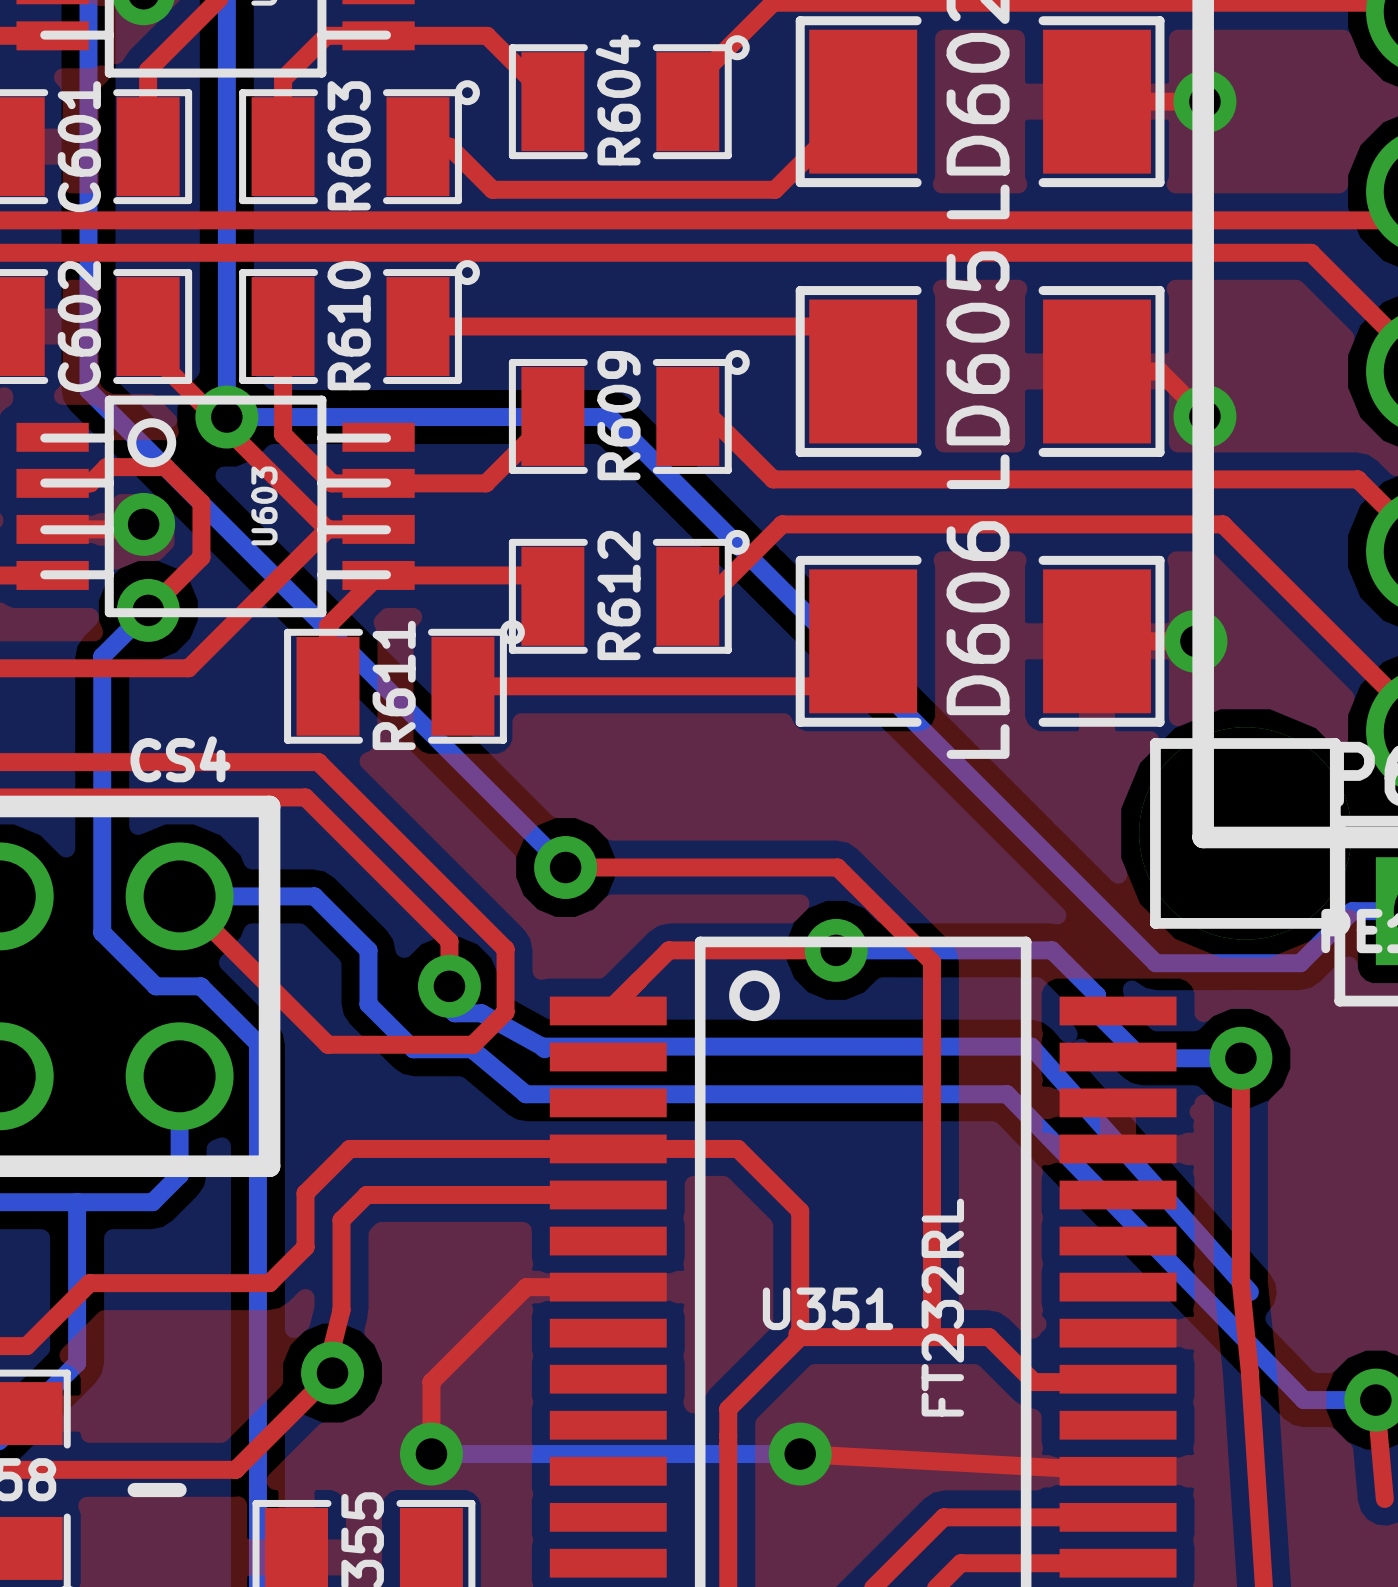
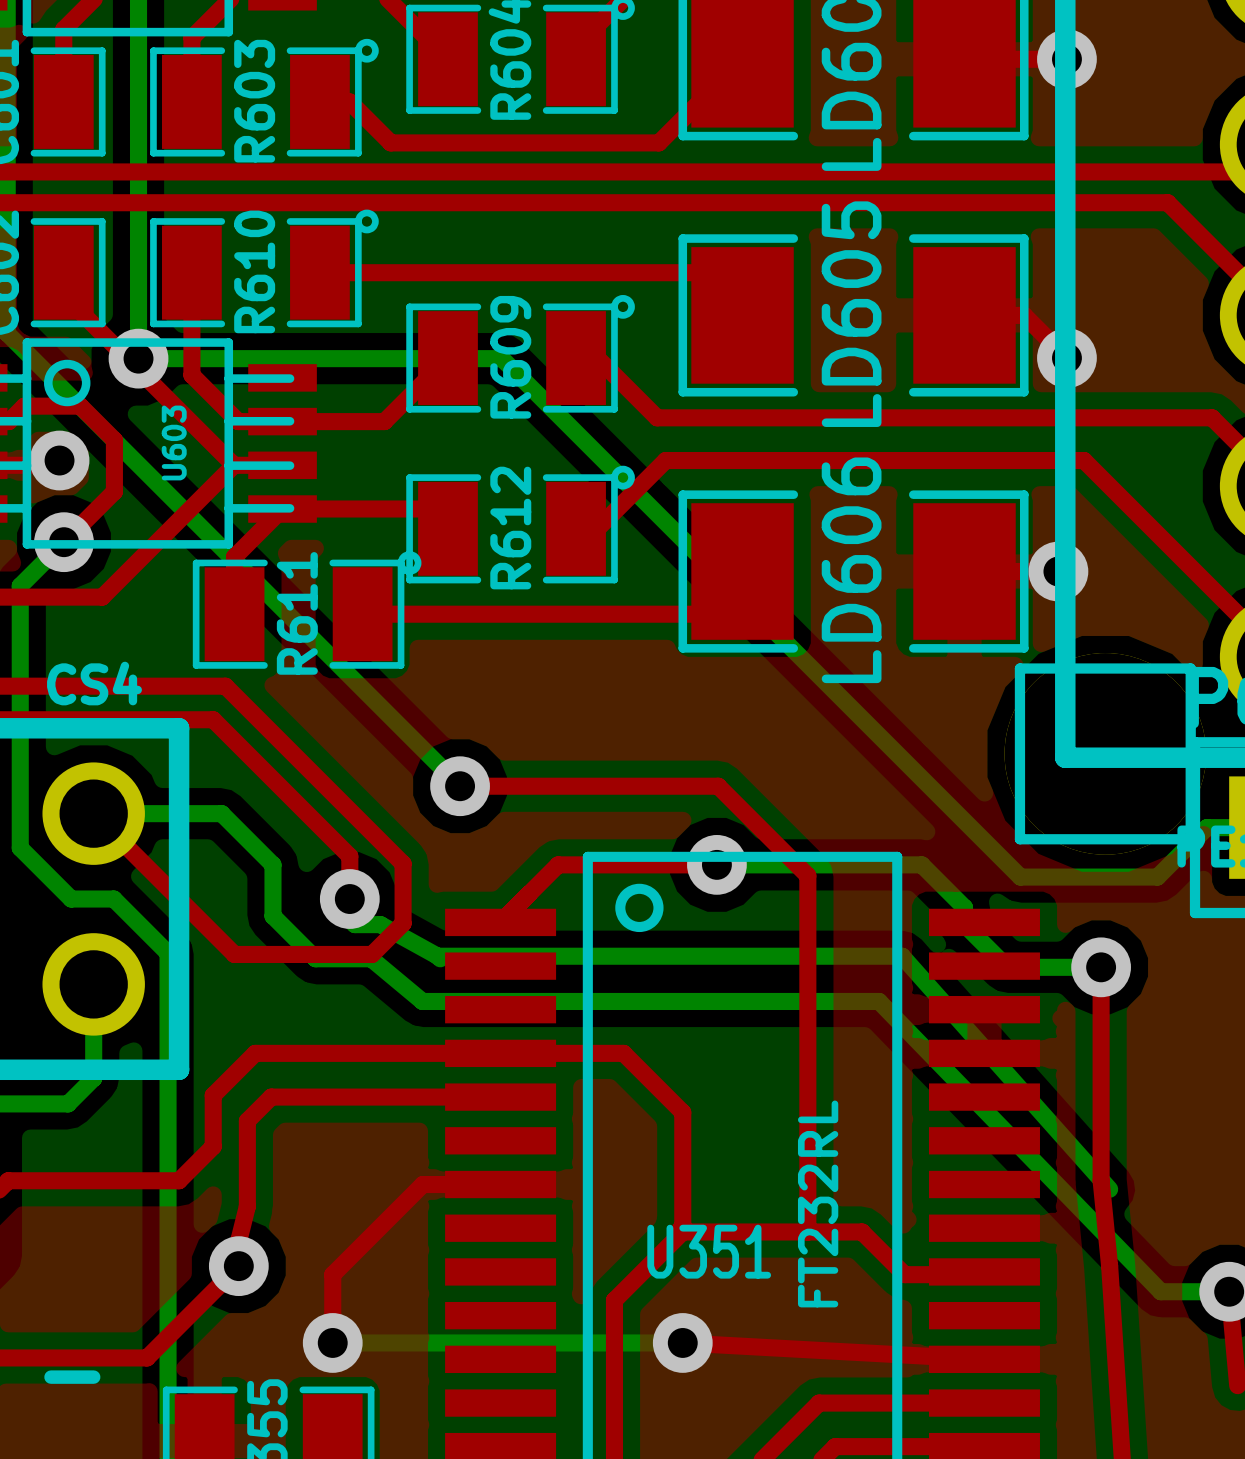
U351 name position: U351 (828, 1308) -> U351 (709, 1251)

